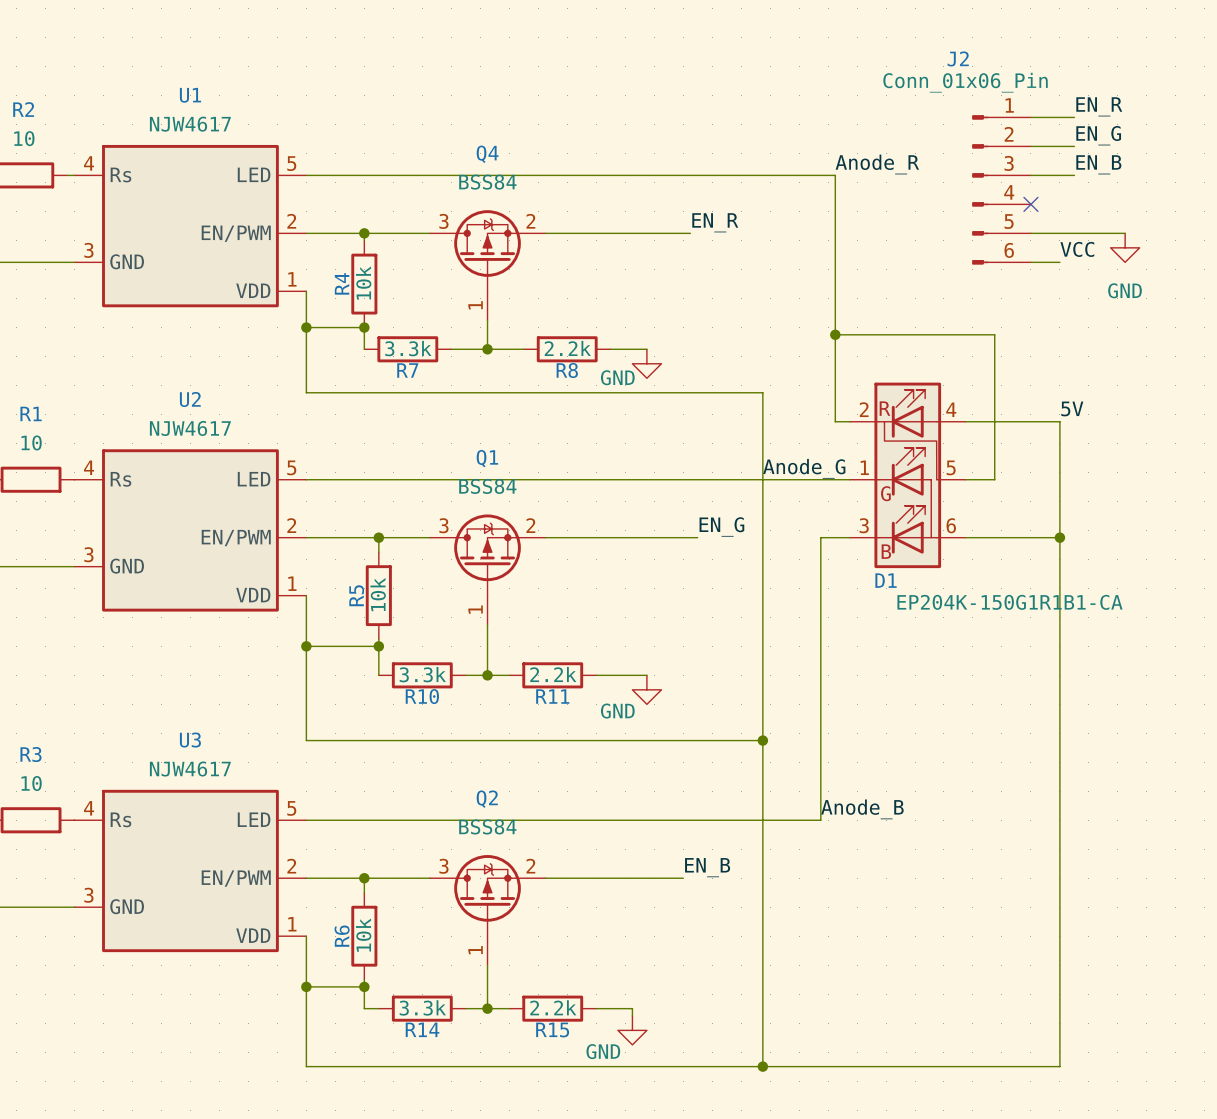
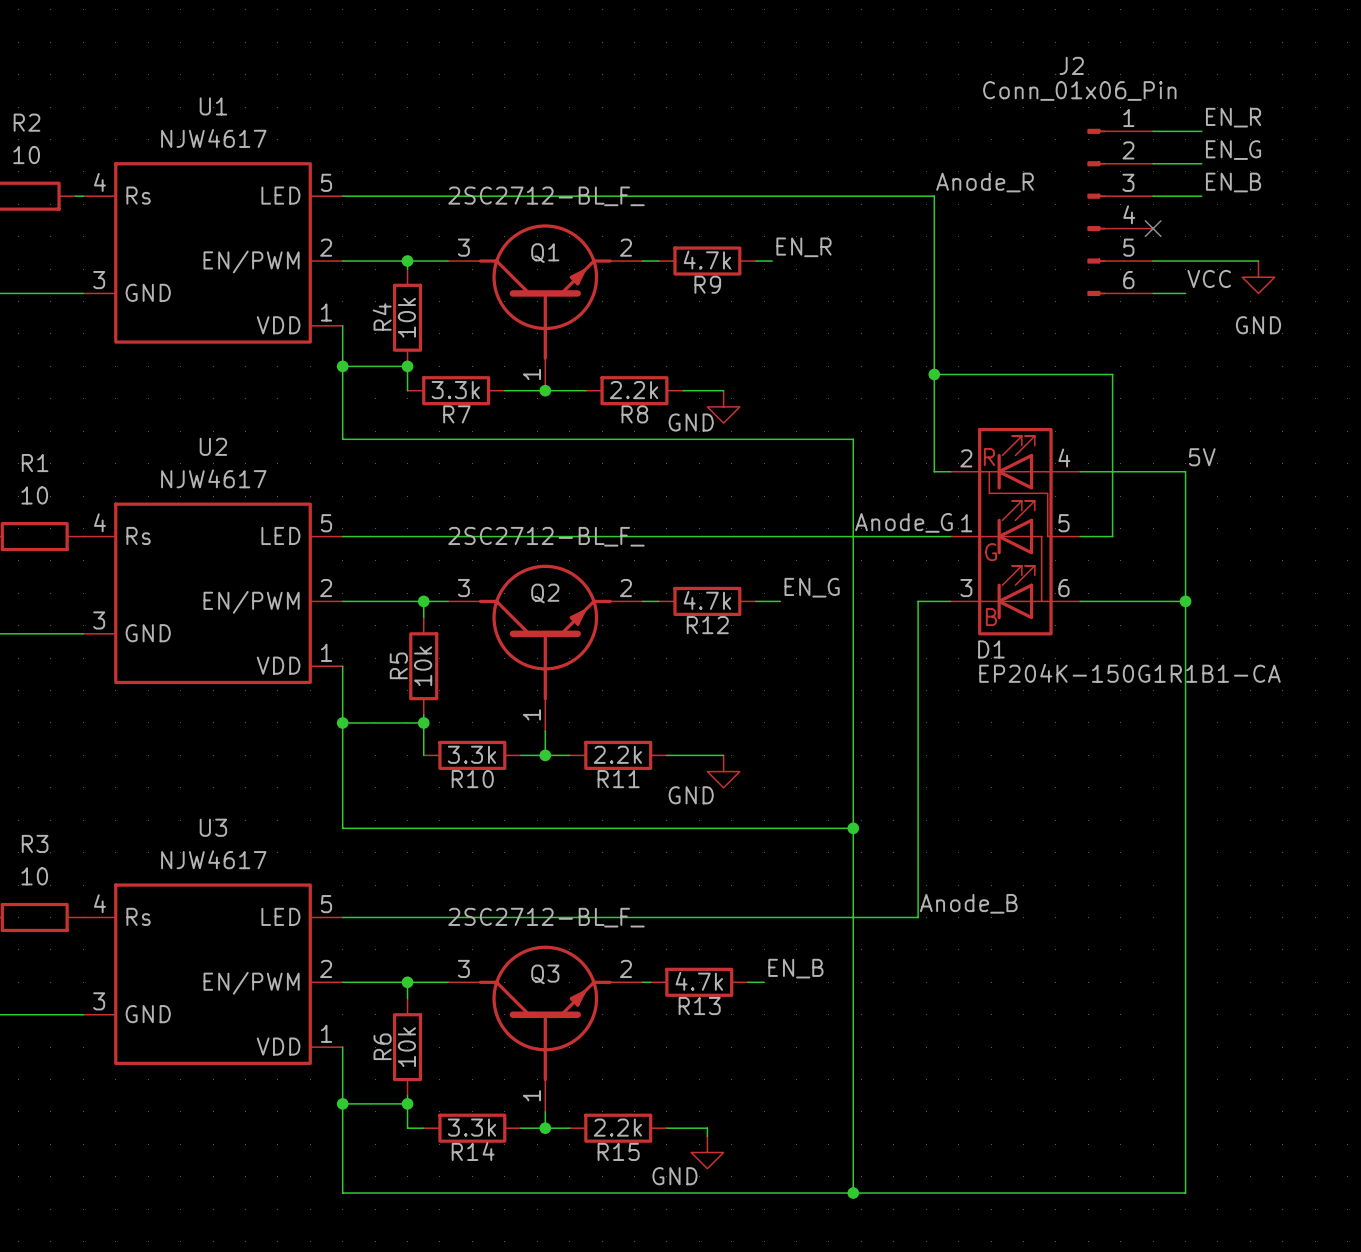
wire: (588, 233) (675, 233) -> none
R9: none -> 4.7k (707, 261)
Q4: BSS84 (487, 265) -> none
Q1 name position: Q1 (487, 458) -> Q1 (545, 253)
Q1 value: BSS84 (487, 486) -> 2SC2712-BL_F_ (546, 196)
Q1 symbol: [429, 514, 546, 625] -> [448, 224, 643, 391]
wire: (588, 537) (675, 537) -> none
R12: none -> 4.7k (707, 601)
Q2 name position: Q2 (487, 799) -> Q2 (545, 593)
Q2 value: BSS84 (487, 826) -> 2SC2712-BL_F_ (546, 536)
Q2 symbol: [429, 855, 546, 966] -> [448, 564, 643, 732]
wire: (581, 878) (668, 878) -> none
R13: none -> 4.7k (699, 982)
Q3: none -> 2SC2712-BL_F_ (545, 1028)

